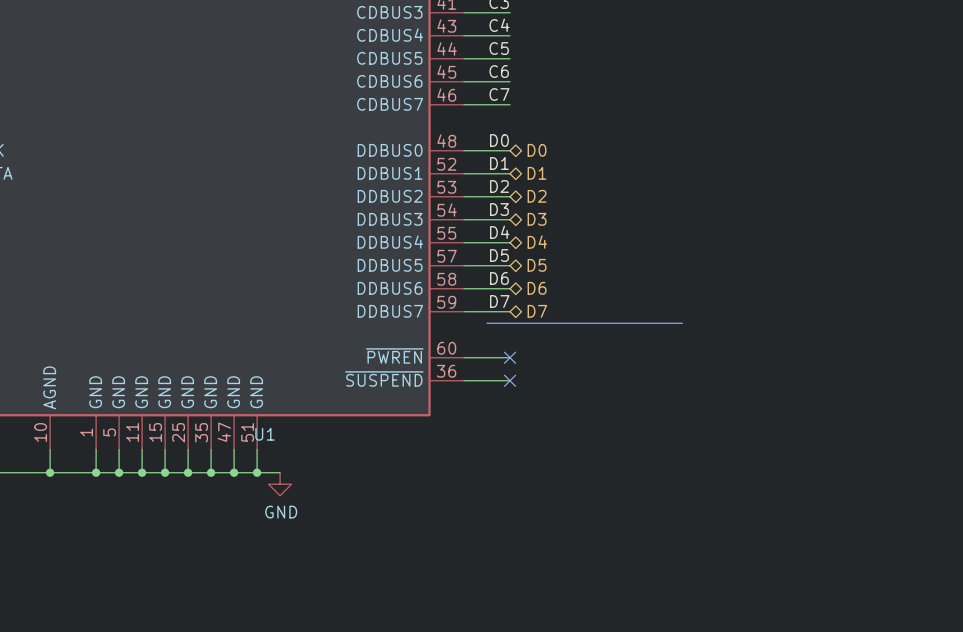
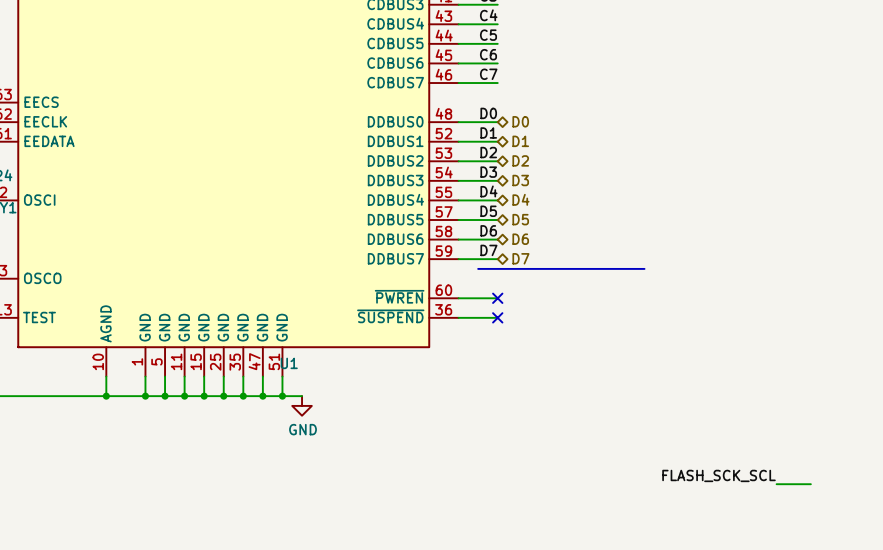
label: none -> FLASH_SCK_SCL (718, 475)
wire: none -> (776, 484) (810, 484)

